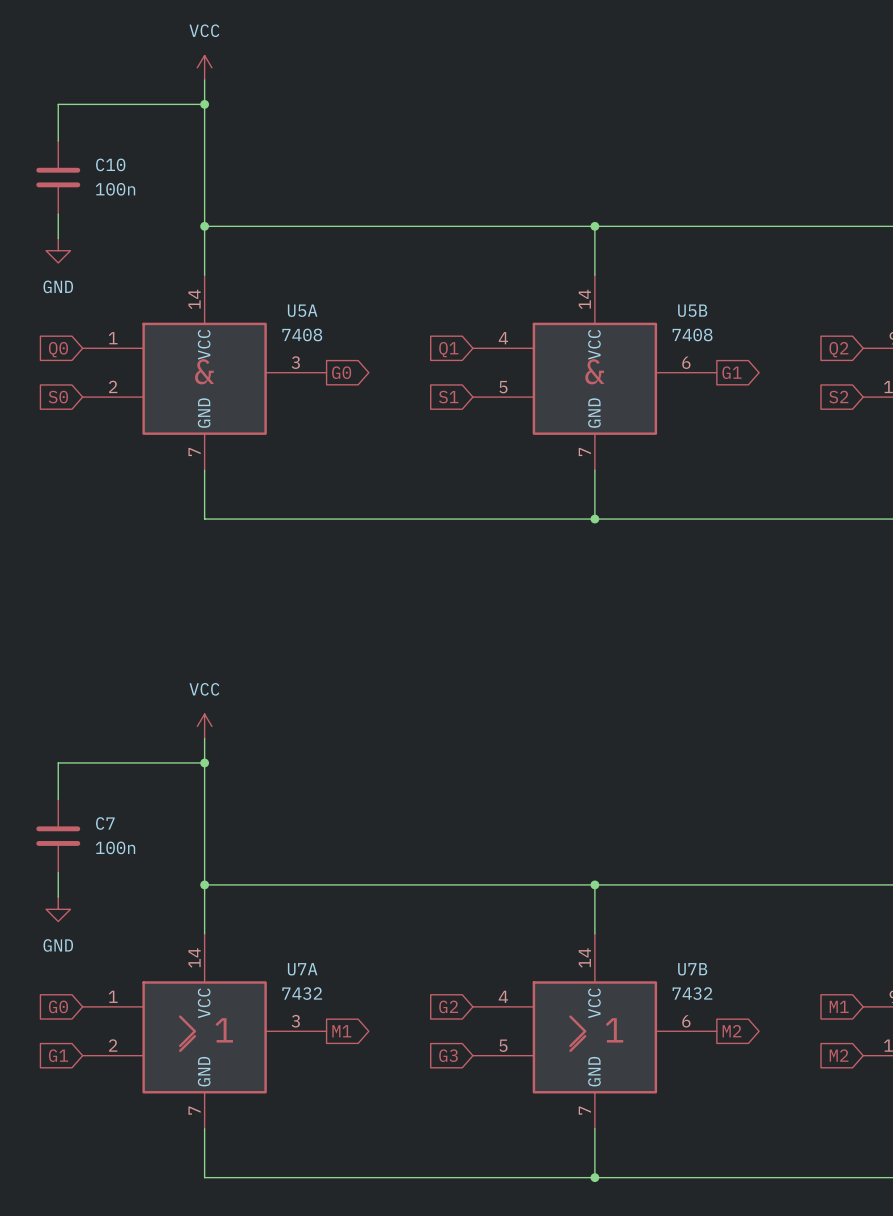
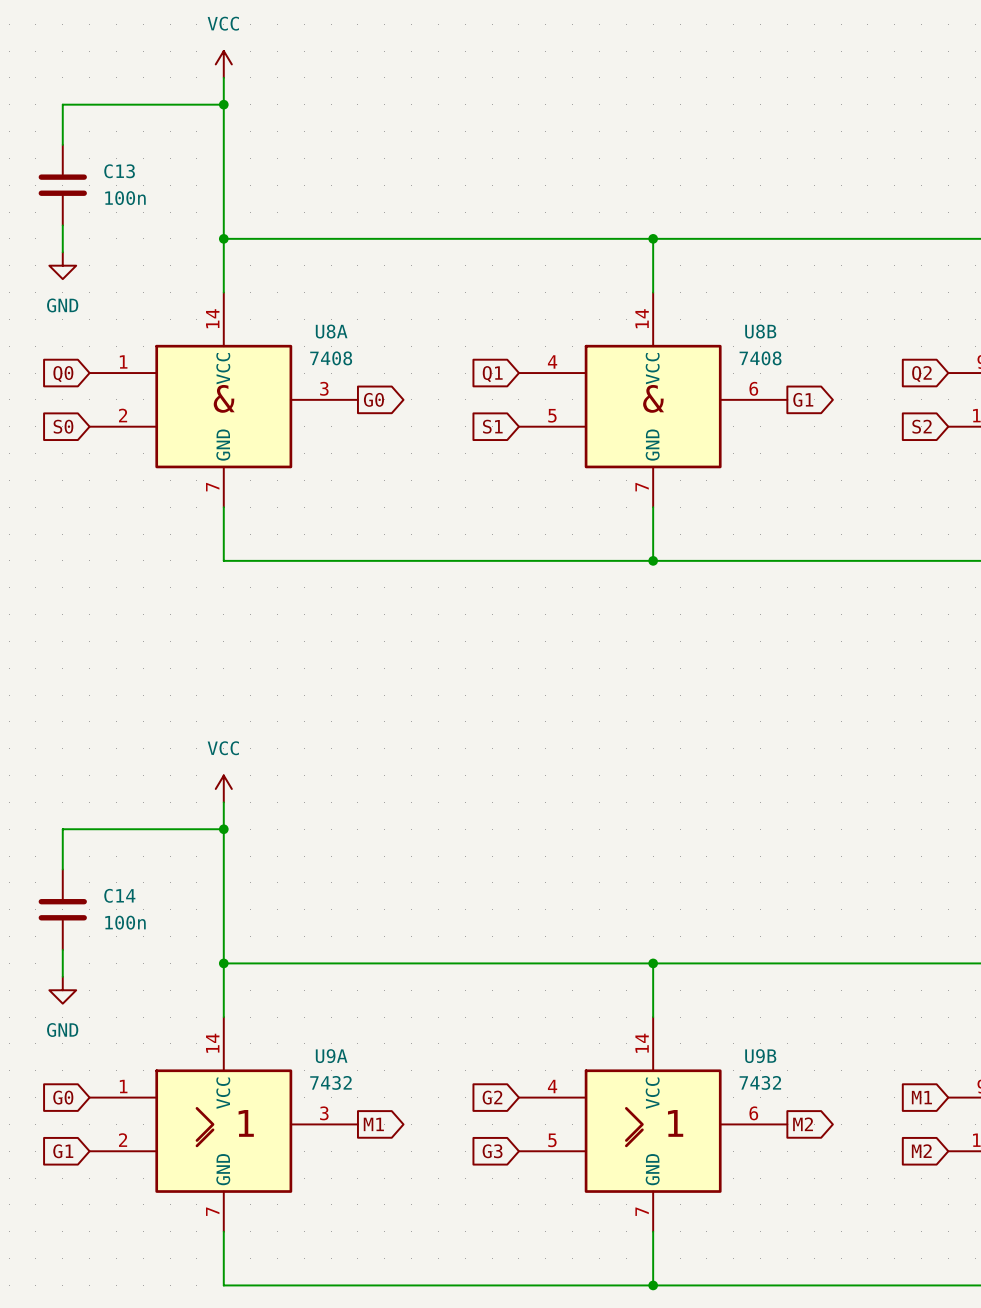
C10 name: C10 (110, 164) -> C13 (119, 171)
U5A name: U5A (302, 310) -> U8A (331, 331)
U5B name: U5B (692, 310) -> U8B (760, 331)
C7 name: C7 (105, 823) -> C14 (119, 895)
U7A name: U7A (302, 969) -> U9A (331, 1056)
U7B name: U7B (692, 969) -> U9B (760, 1056)

